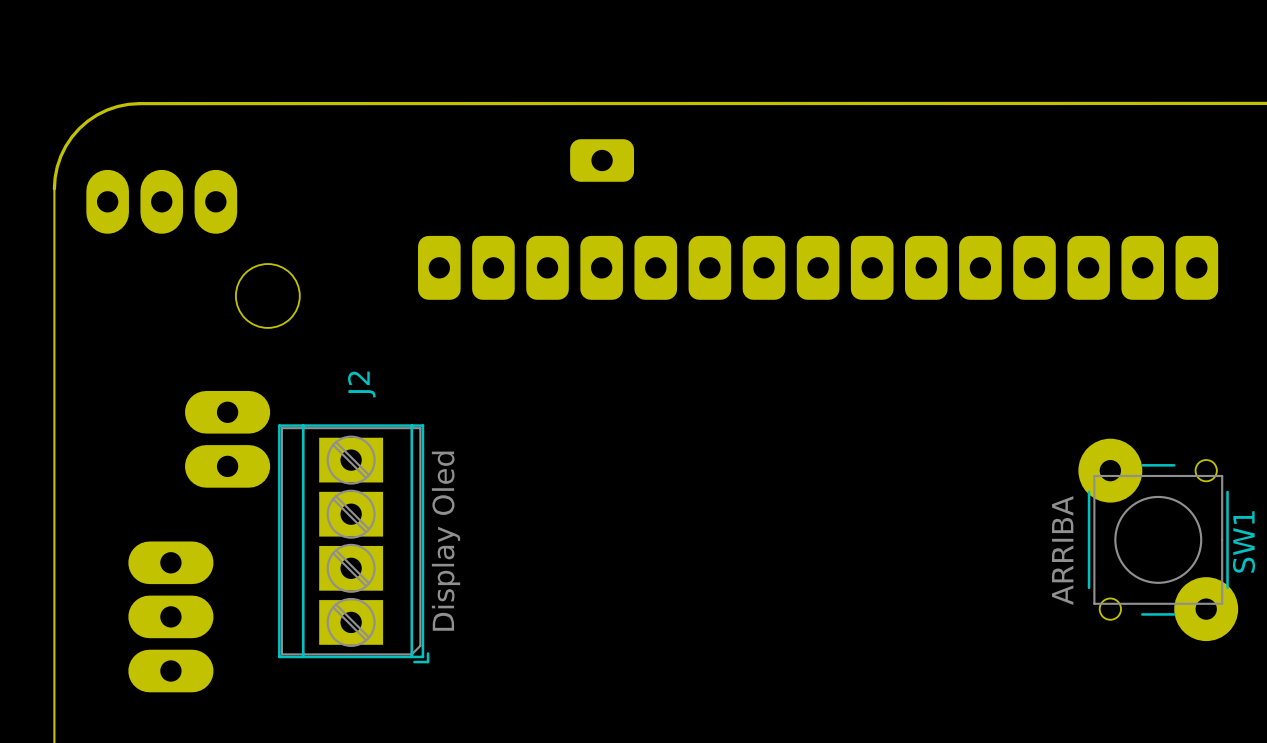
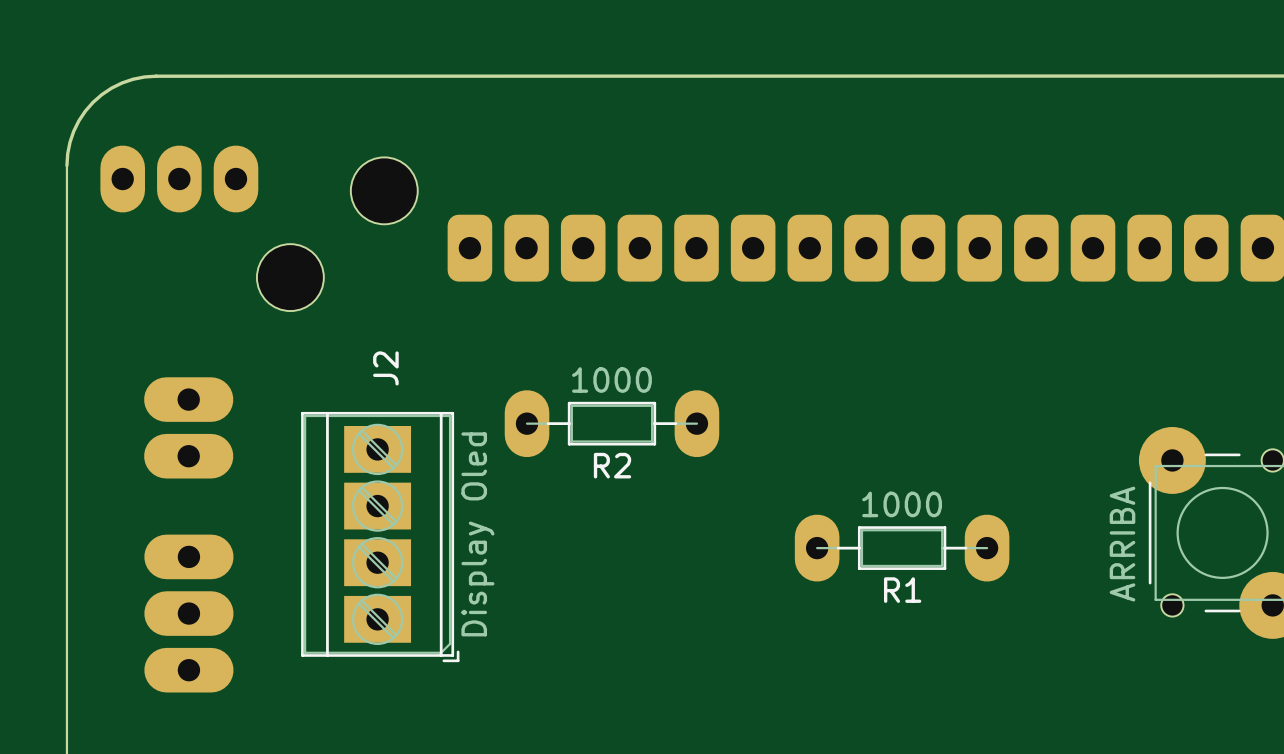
part: (602, 160) -> none
part: none -> (384, 190)
R2: none -> 1000 (611, 423)
part position: (227, 439) -> (188, 427)
R1: none -> 1000 (902, 548)

